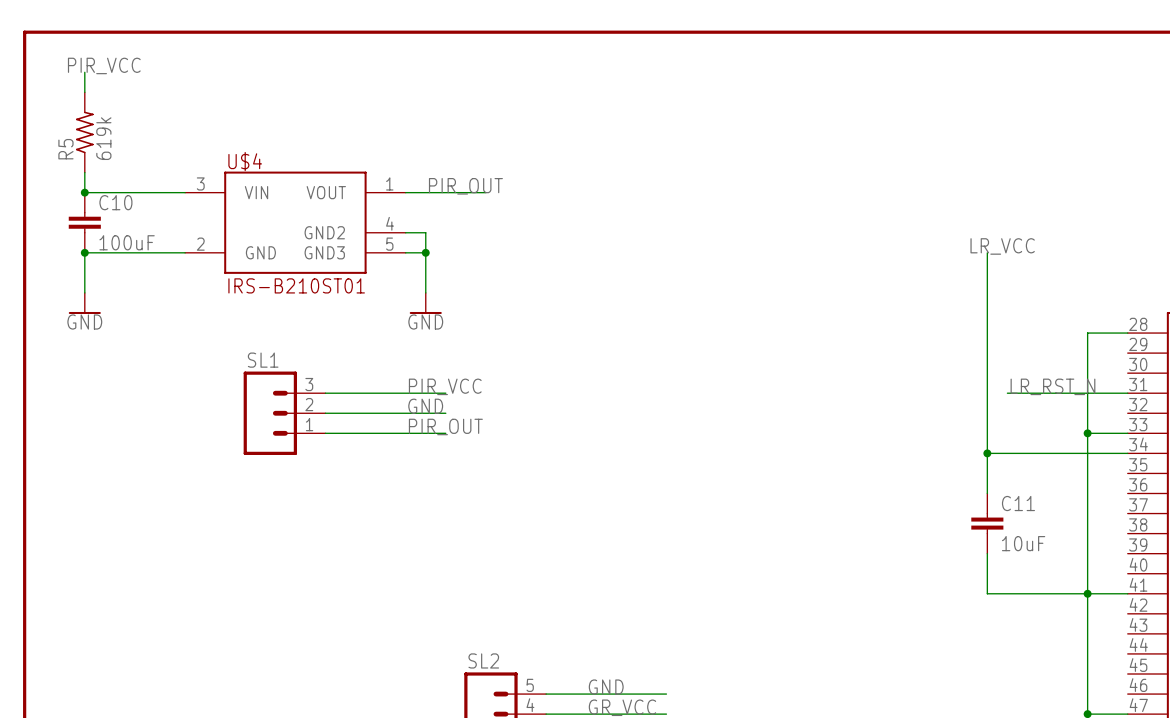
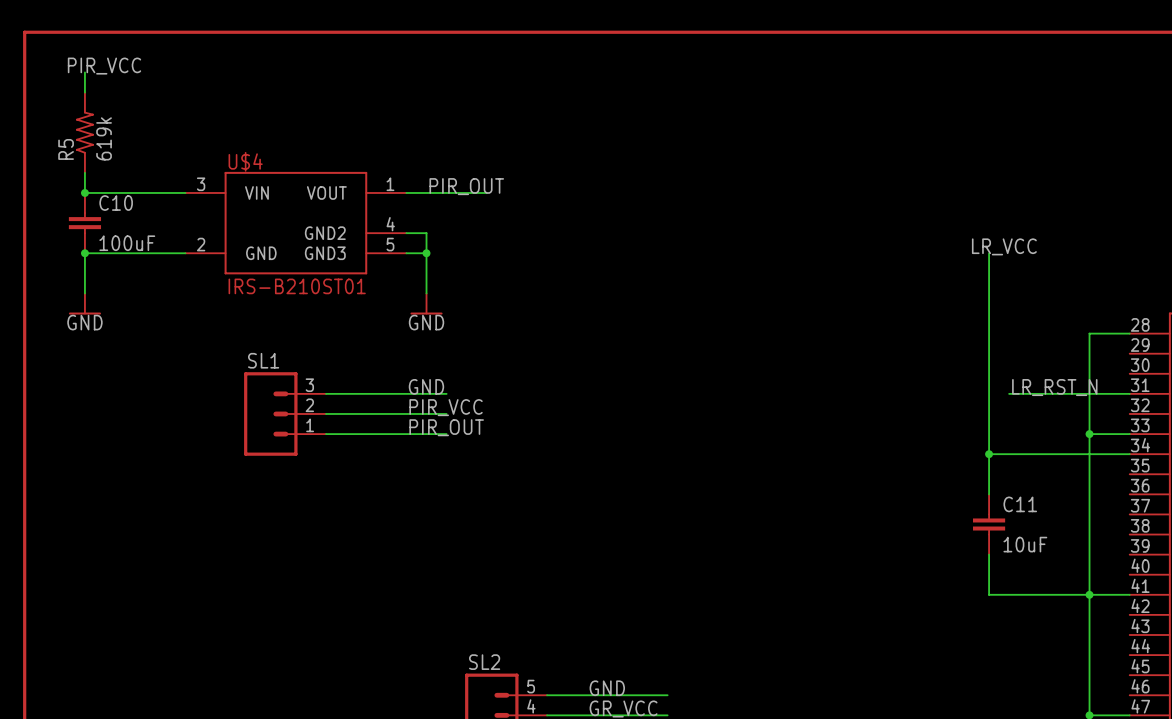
label: PIR_VCC (445, 386) -> GND (426, 386)
label: GND (425, 406) -> PIR_VCC (446, 407)

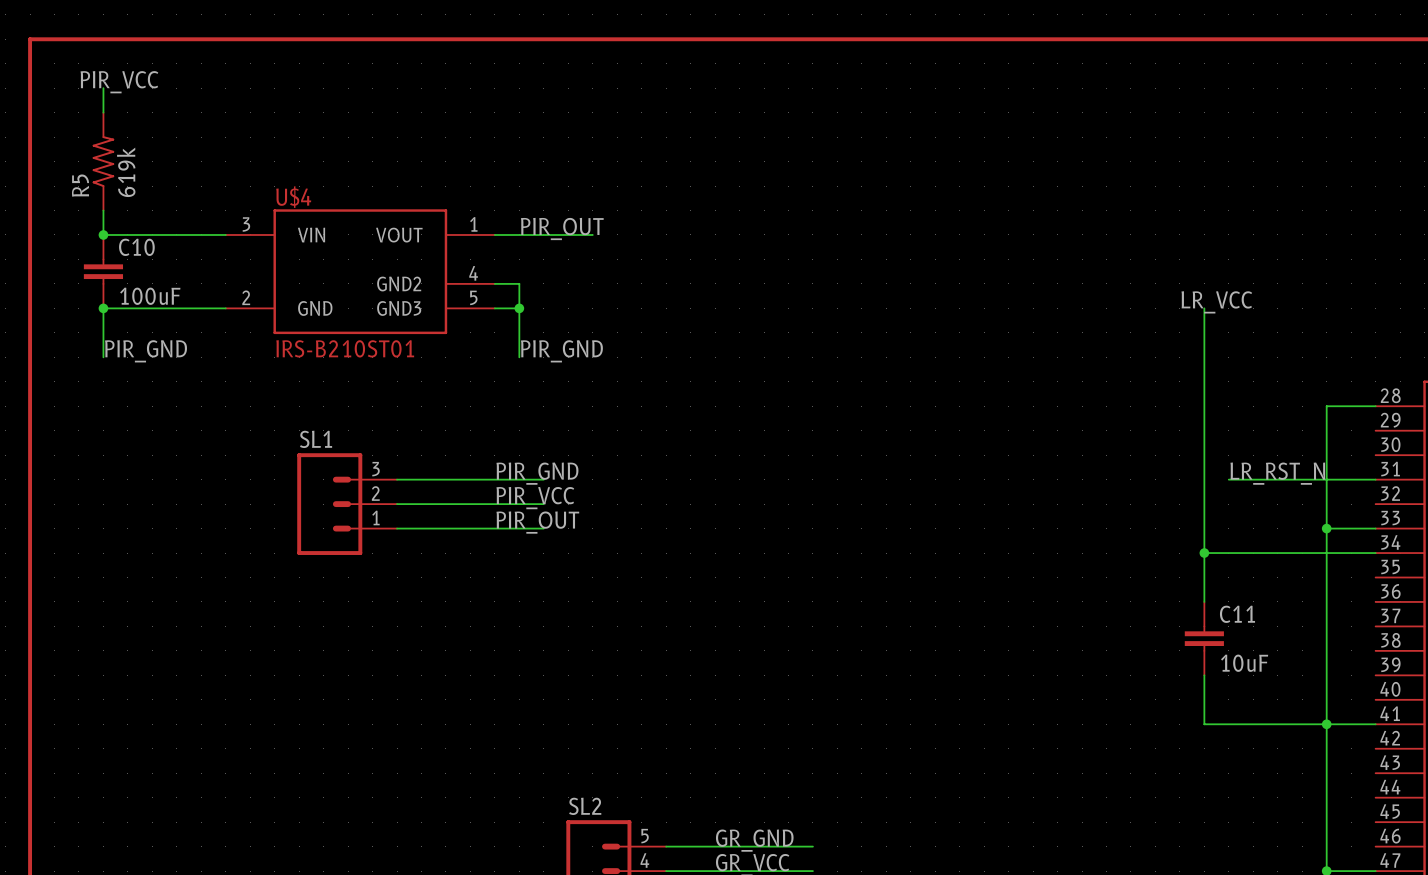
label: none -> PIR_GND (146, 351)
label: none -> PIR_GND (561, 351)
power symbol: GND (84, 303) -> none
power symbol: GND (426, 303) -> none
label: GND (426, 386) -> PIR_GND (537, 473)
label: GND (607, 688) -> GR_GND (754, 840)

